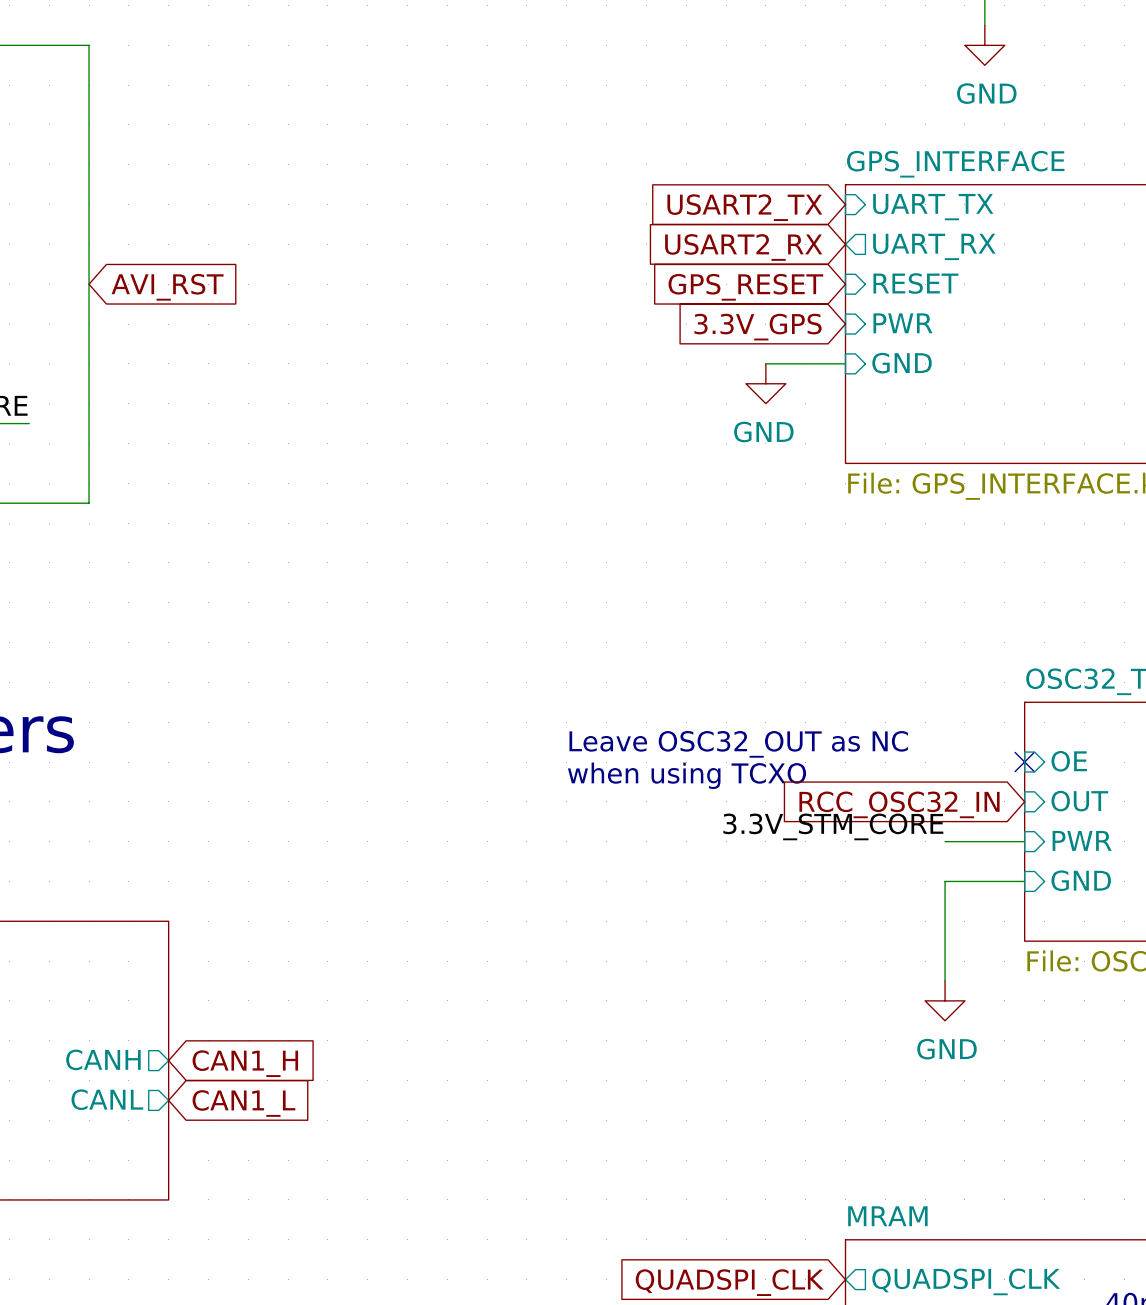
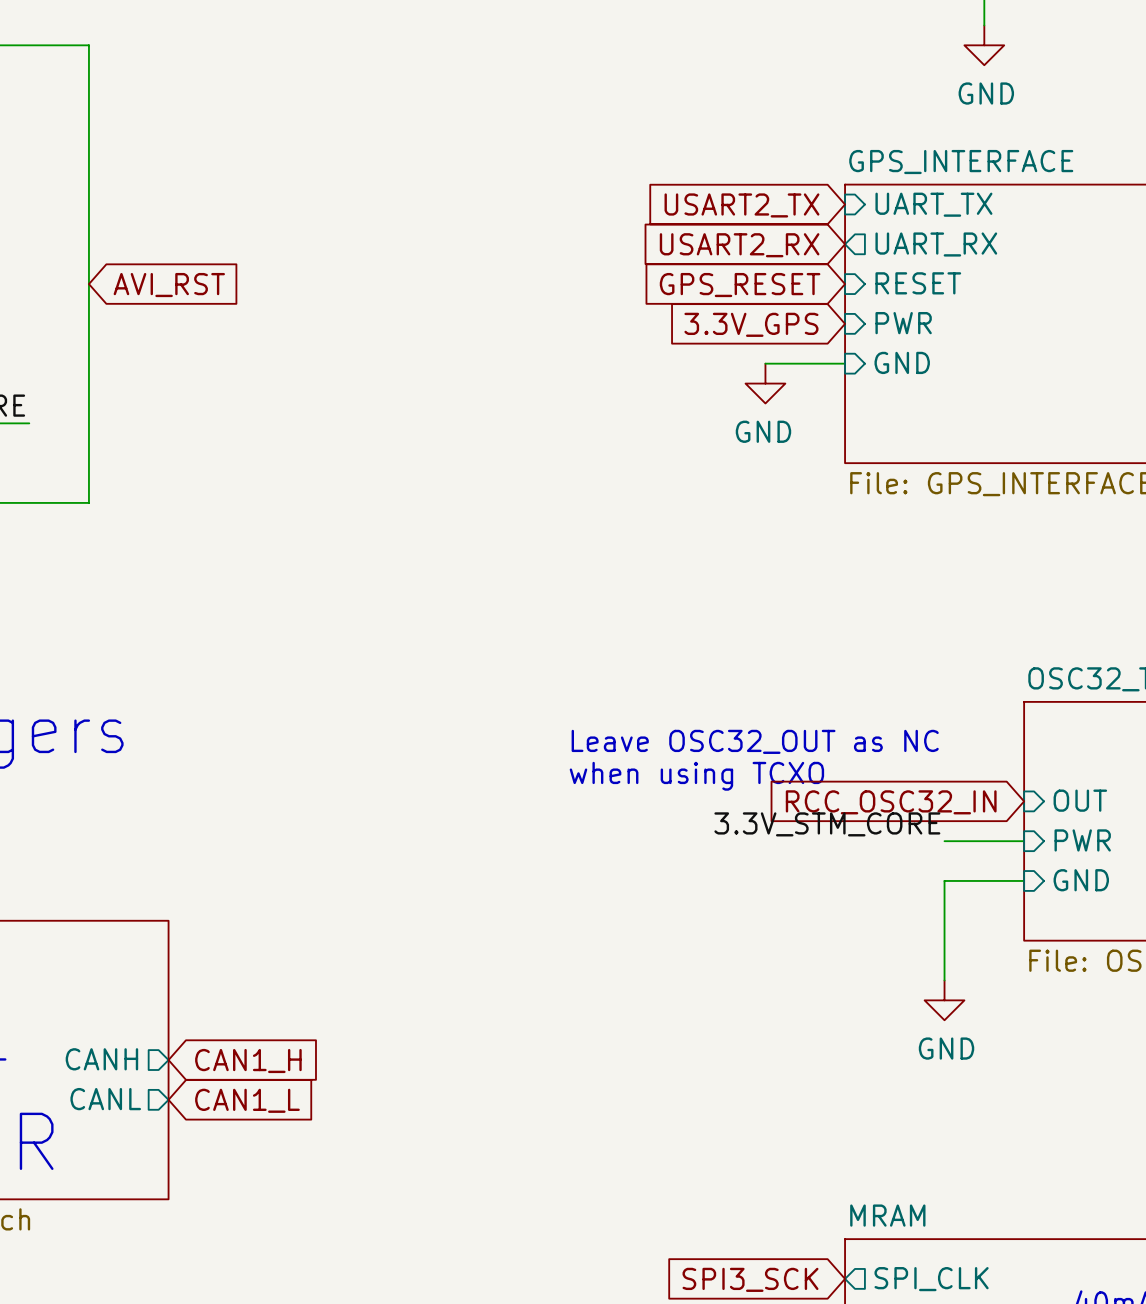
sheet pin: OE (1069, 761) -> none
no-connect mark: (1024, 762) -> none
sheet pin: QUADSPI_CLK (966, 1281) -> SPI_CLK (931, 1279)
global label: QUADSPI_CLK (729, 1282) -> SPI3_SCK (750, 1279)

